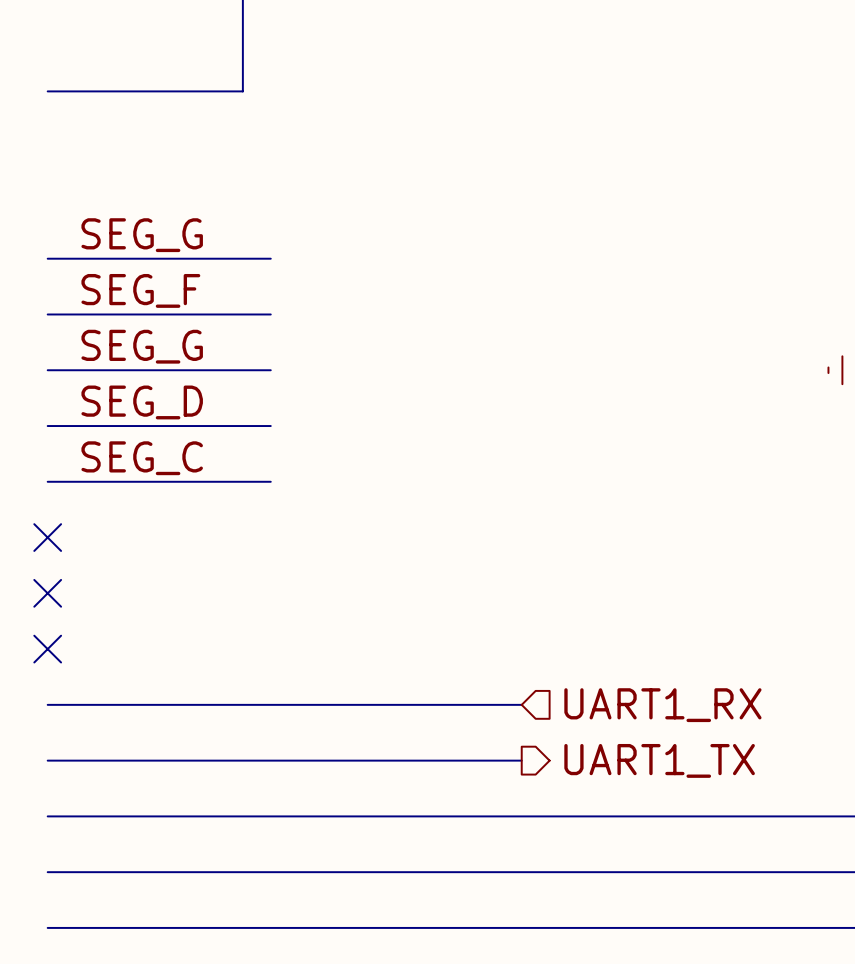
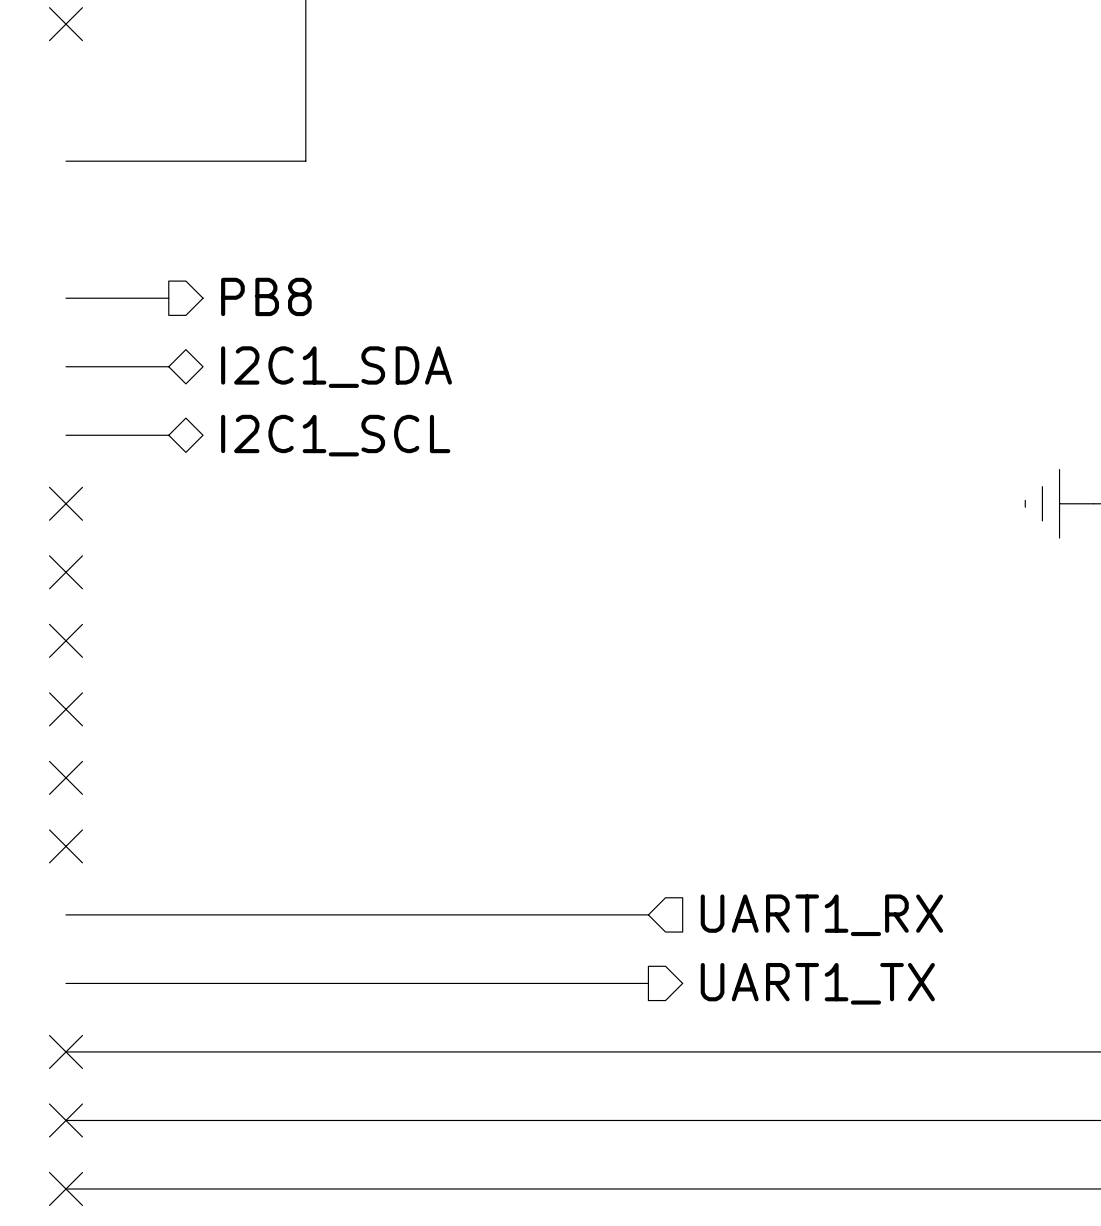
hierarchical label: none -> PB8 (266, 296)
wire: none -> (65, 298) (168, 298)
label: SEG_G (142, 235) -> none
wire: (131, 258) (270, 258) -> none
hierarchical label: none -> I2C1_SDA (336, 367)
label: SEG_F (140, 290) -> none
wire: (131, 314) (270, 314) -> none
hierarchical label: none -> I2C1_SCL (335, 435)
label: SEG_G (142, 346) -> none
wire: (47, 370) (270, 370) -> none
no-connect mark: none -> (65, 503)
label: SEG_D (142, 402) -> none
wire: (47, 426) (270, 426) -> none
no-connect mark: none -> (65, 572)
label: SEG_C (142, 458) -> none
wire: (47, 481) (270, 481) -> none
no-connect mark: none -> (65, 640)
no-connect mark: none -> (65, 1051)
no-connect mark: none -> (65, 1120)
no-connect mark: none -> (65, 1188)

